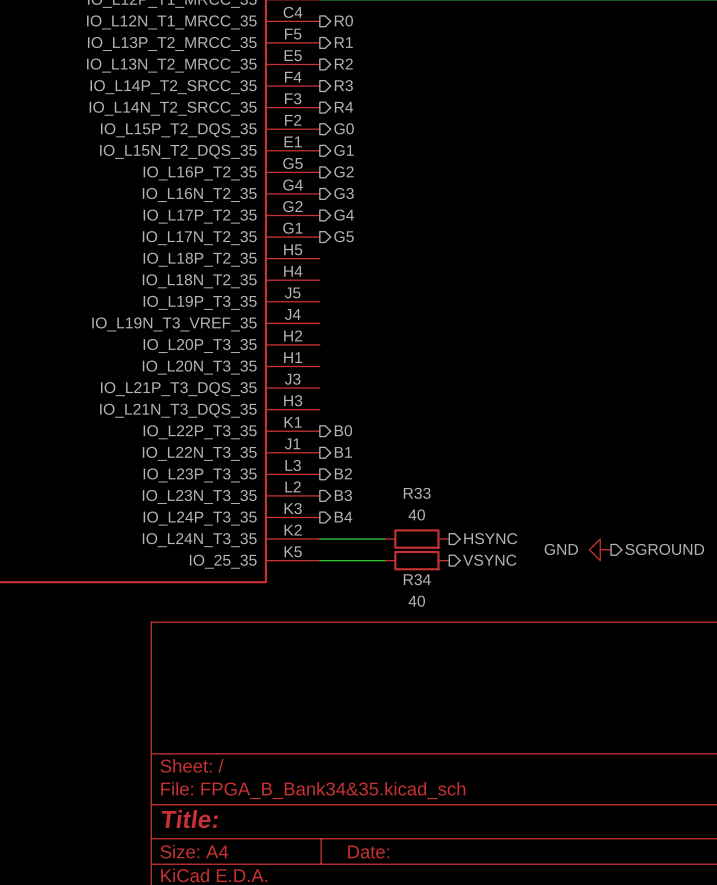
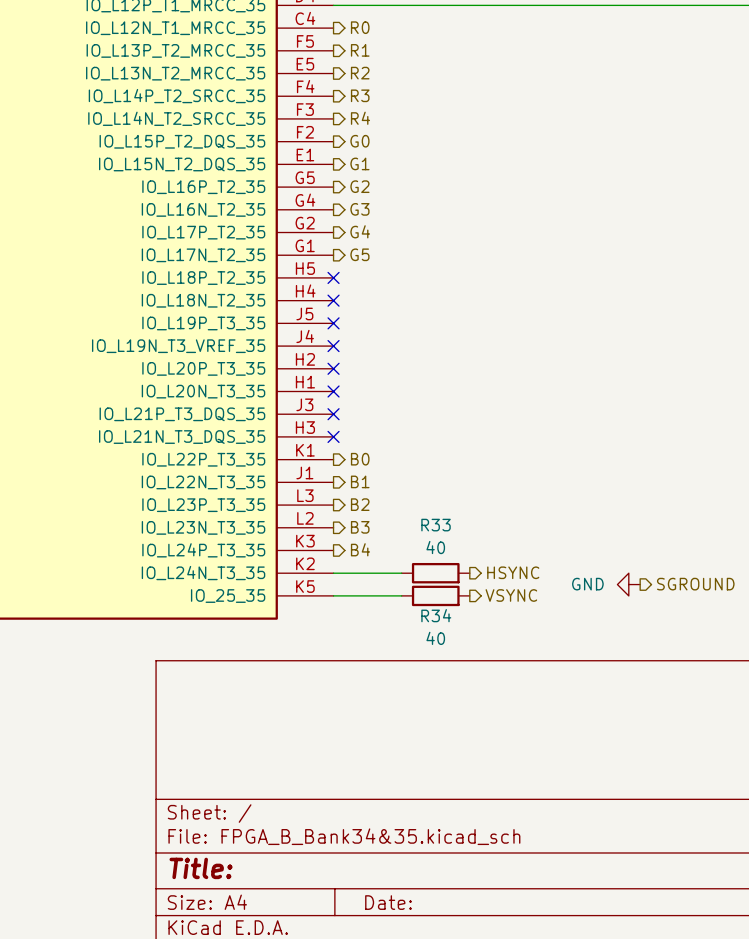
no-connect mark: none -> (333, 277)
no-connect mark: none -> (333, 300)
no-connect mark: none -> (333, 323)
no-connect mark: none -> (333, 346)
no-connect mark: none -> (333, 368)
no-connect mark: none -> (333, 391)
no-connect mark: none -> (333, 414)
no-connect mark: none -> (333, 436)

